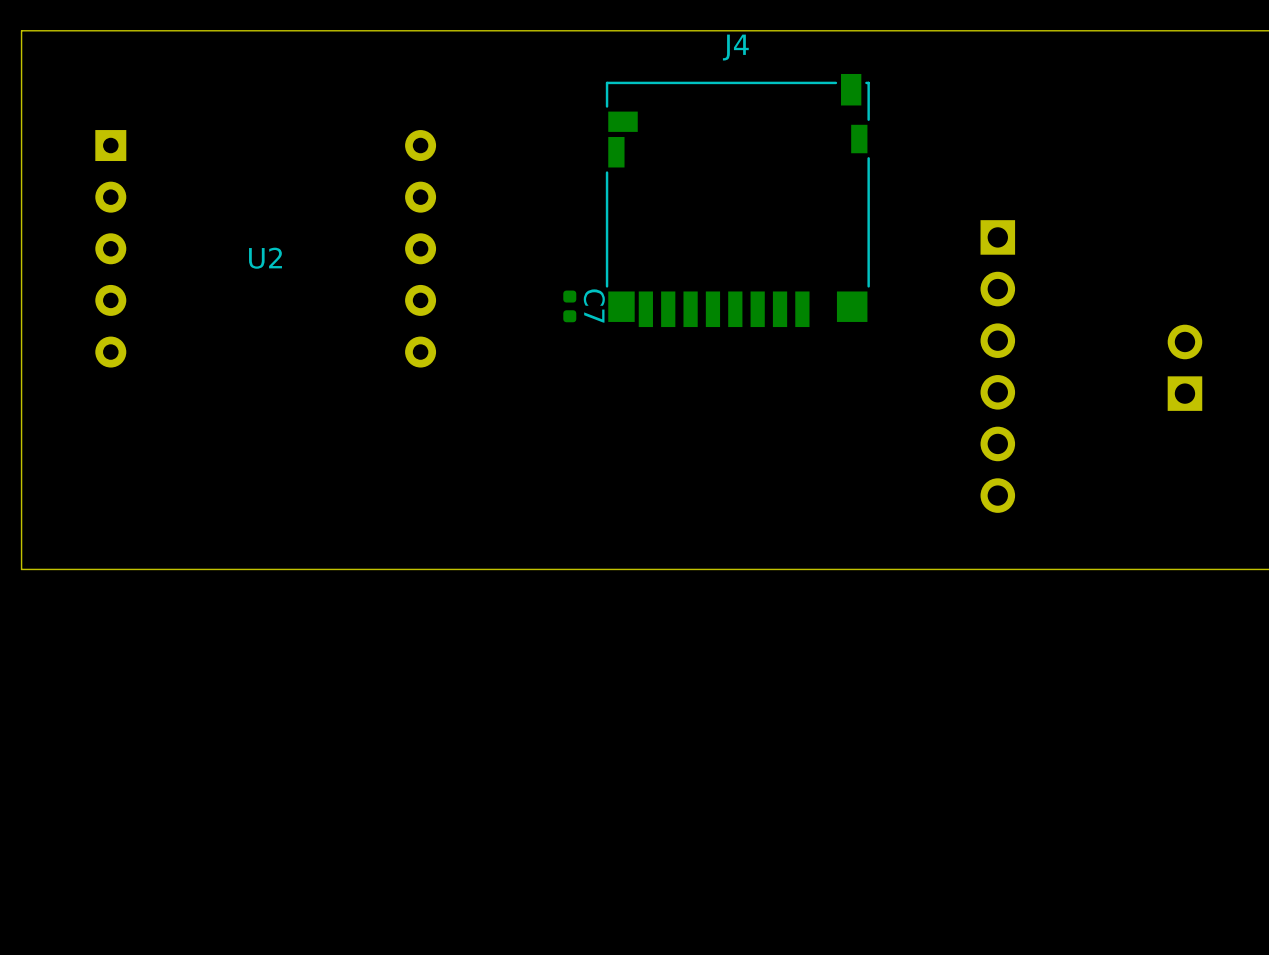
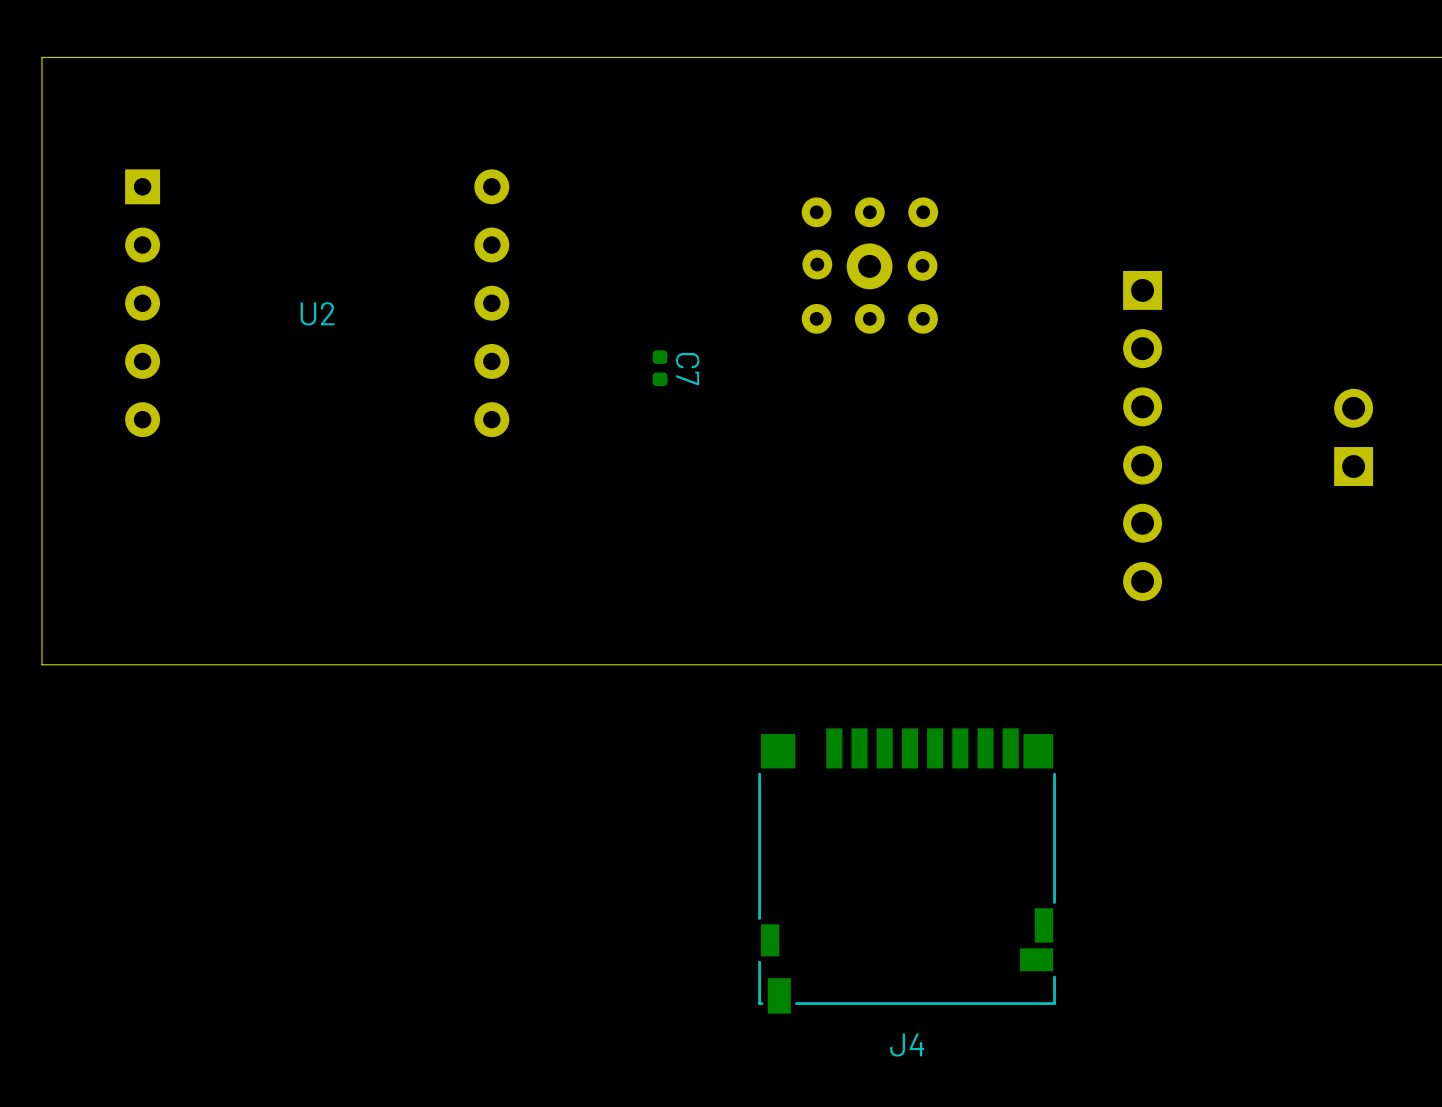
J4 rotation: 0° (737, 200) -> 180° (907, 871)
J4 position: (737, 200) -> (907, 871)
part: none -> (869, 265)

